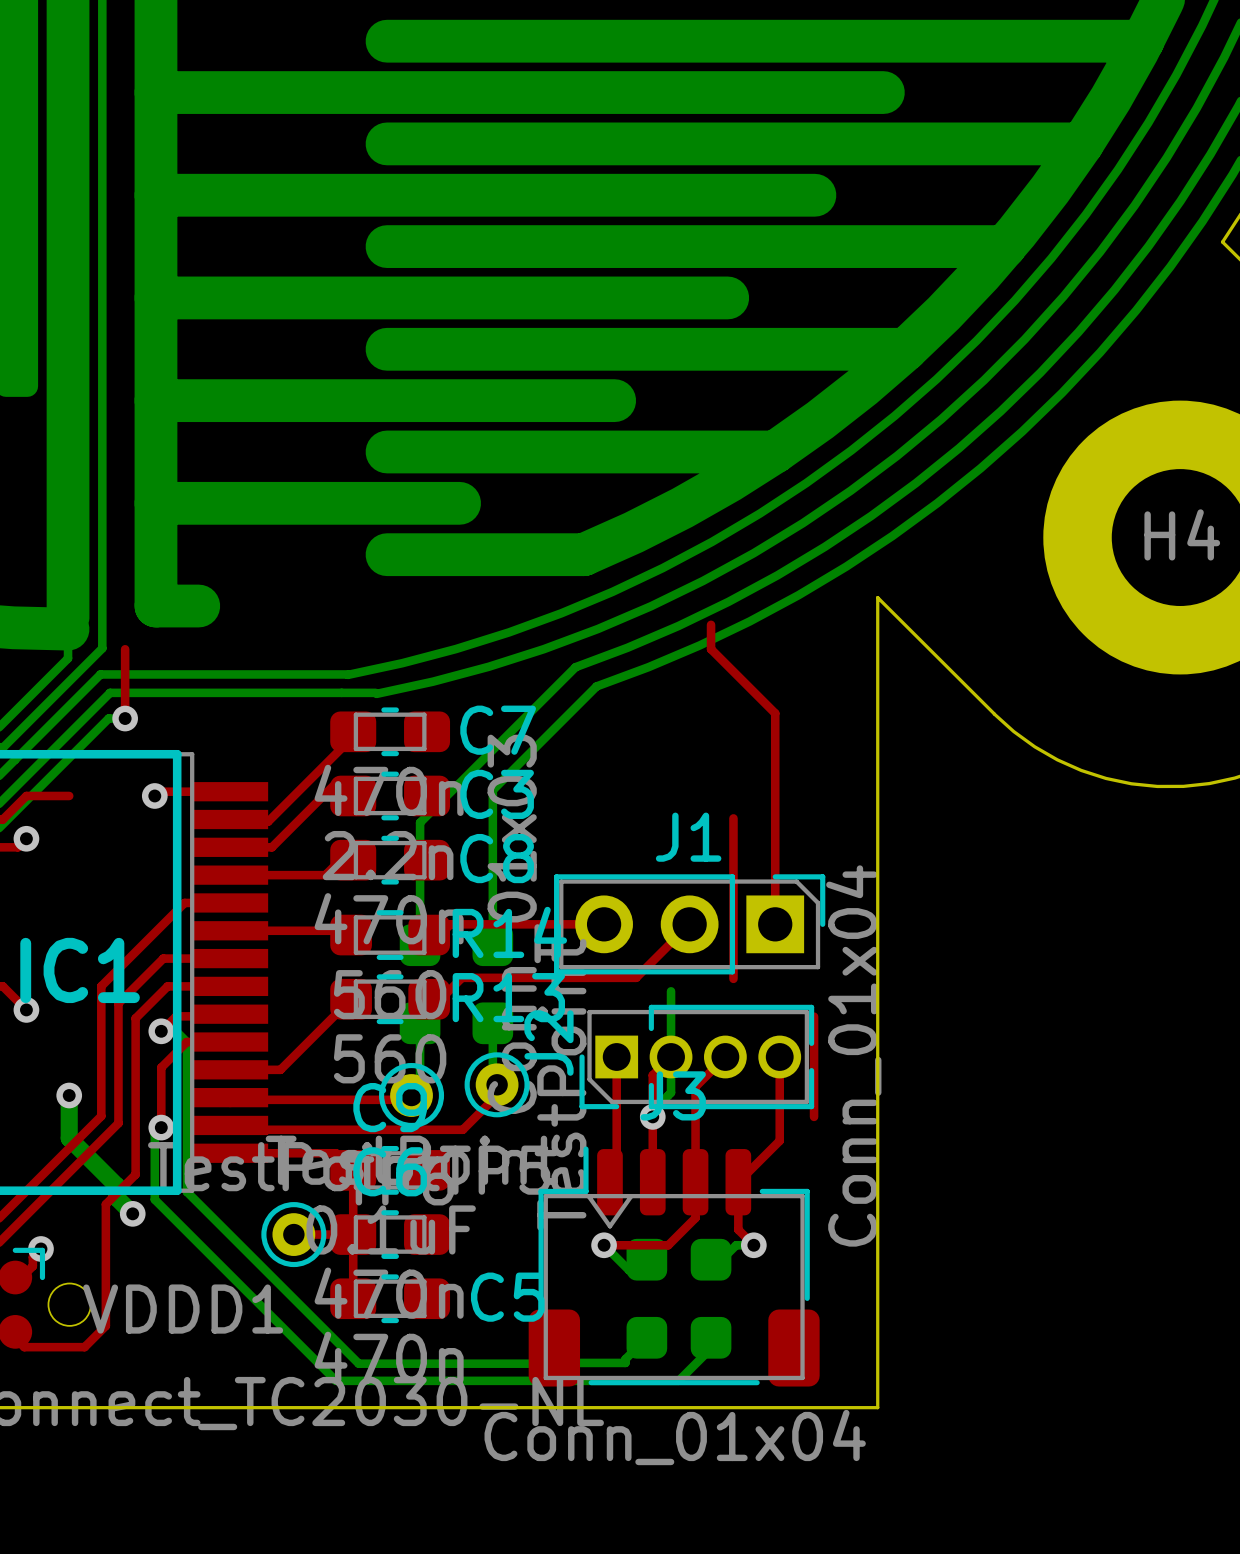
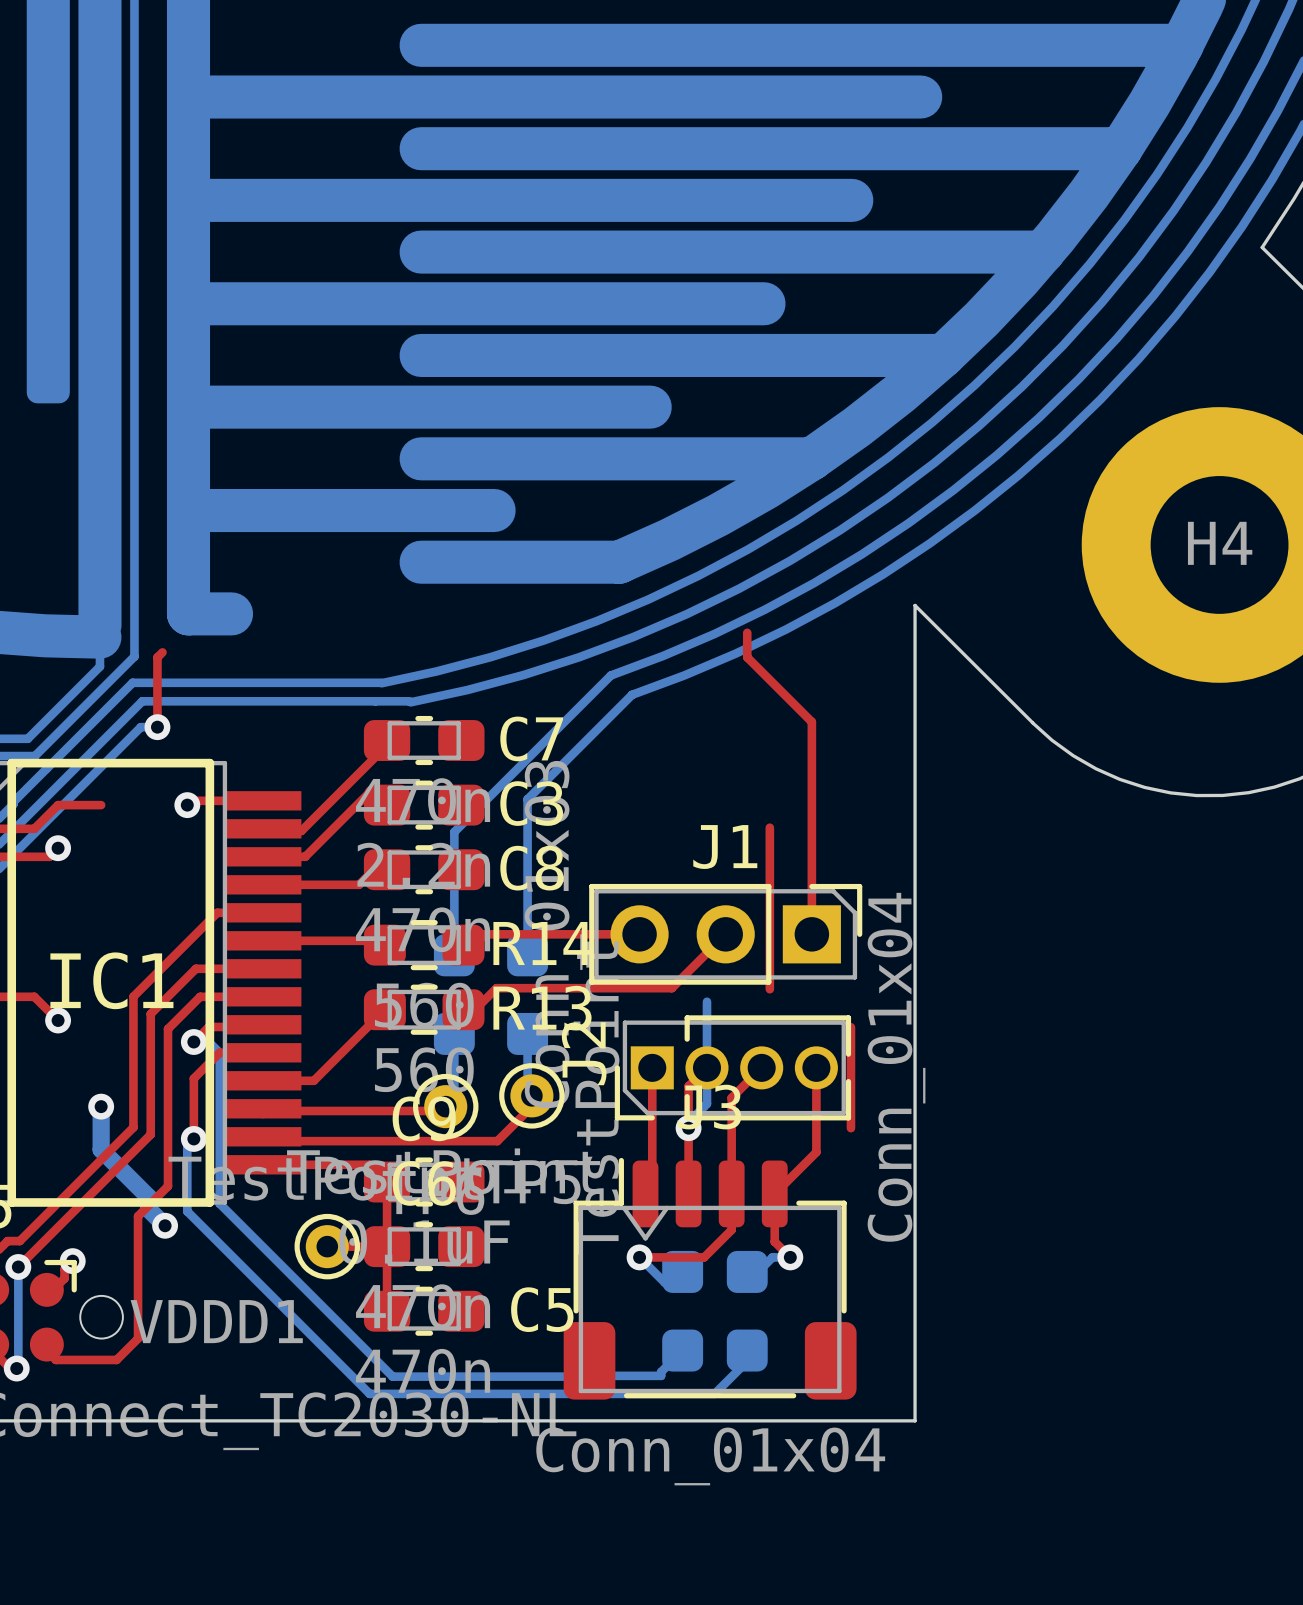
top track: none -> (162, 652) (157, 657)

